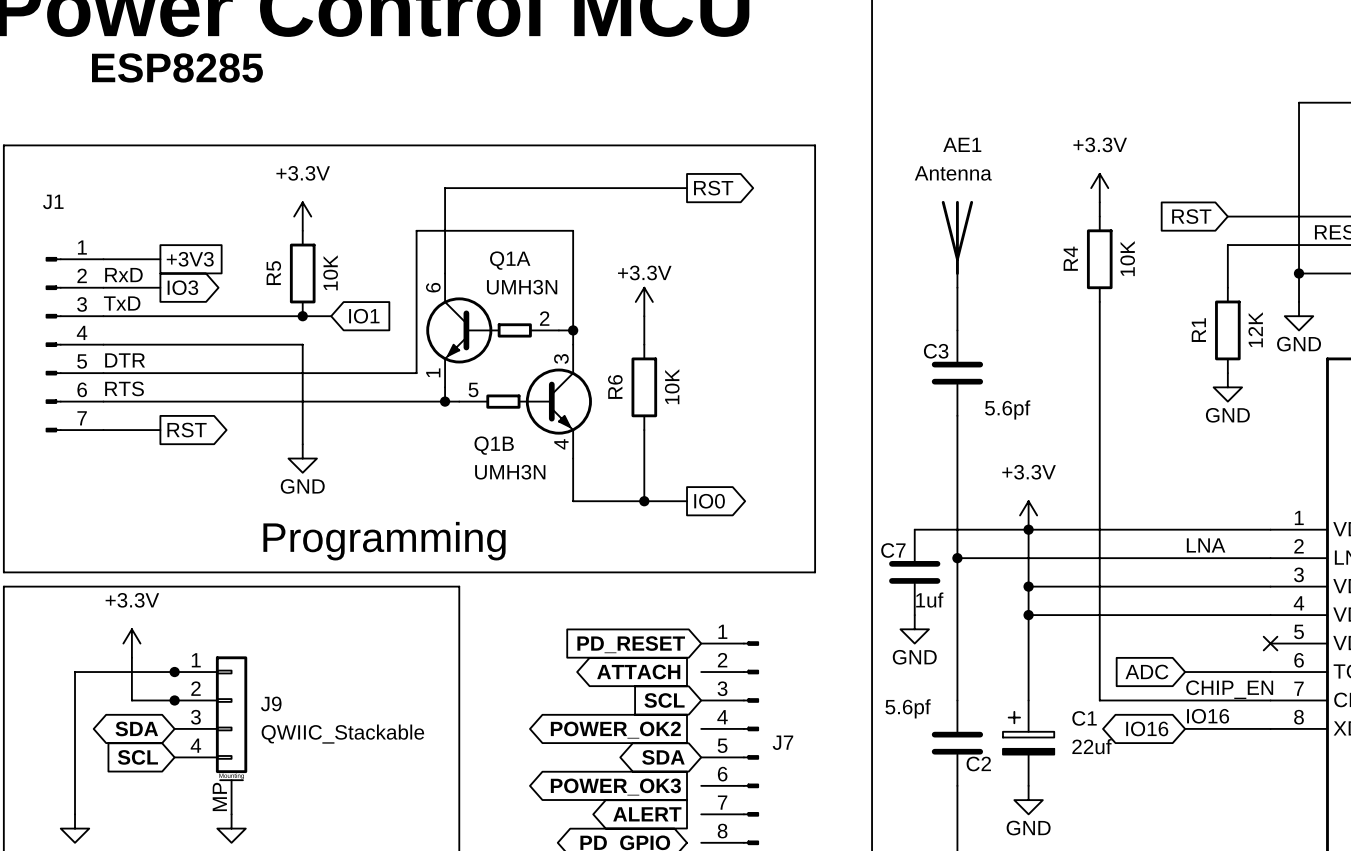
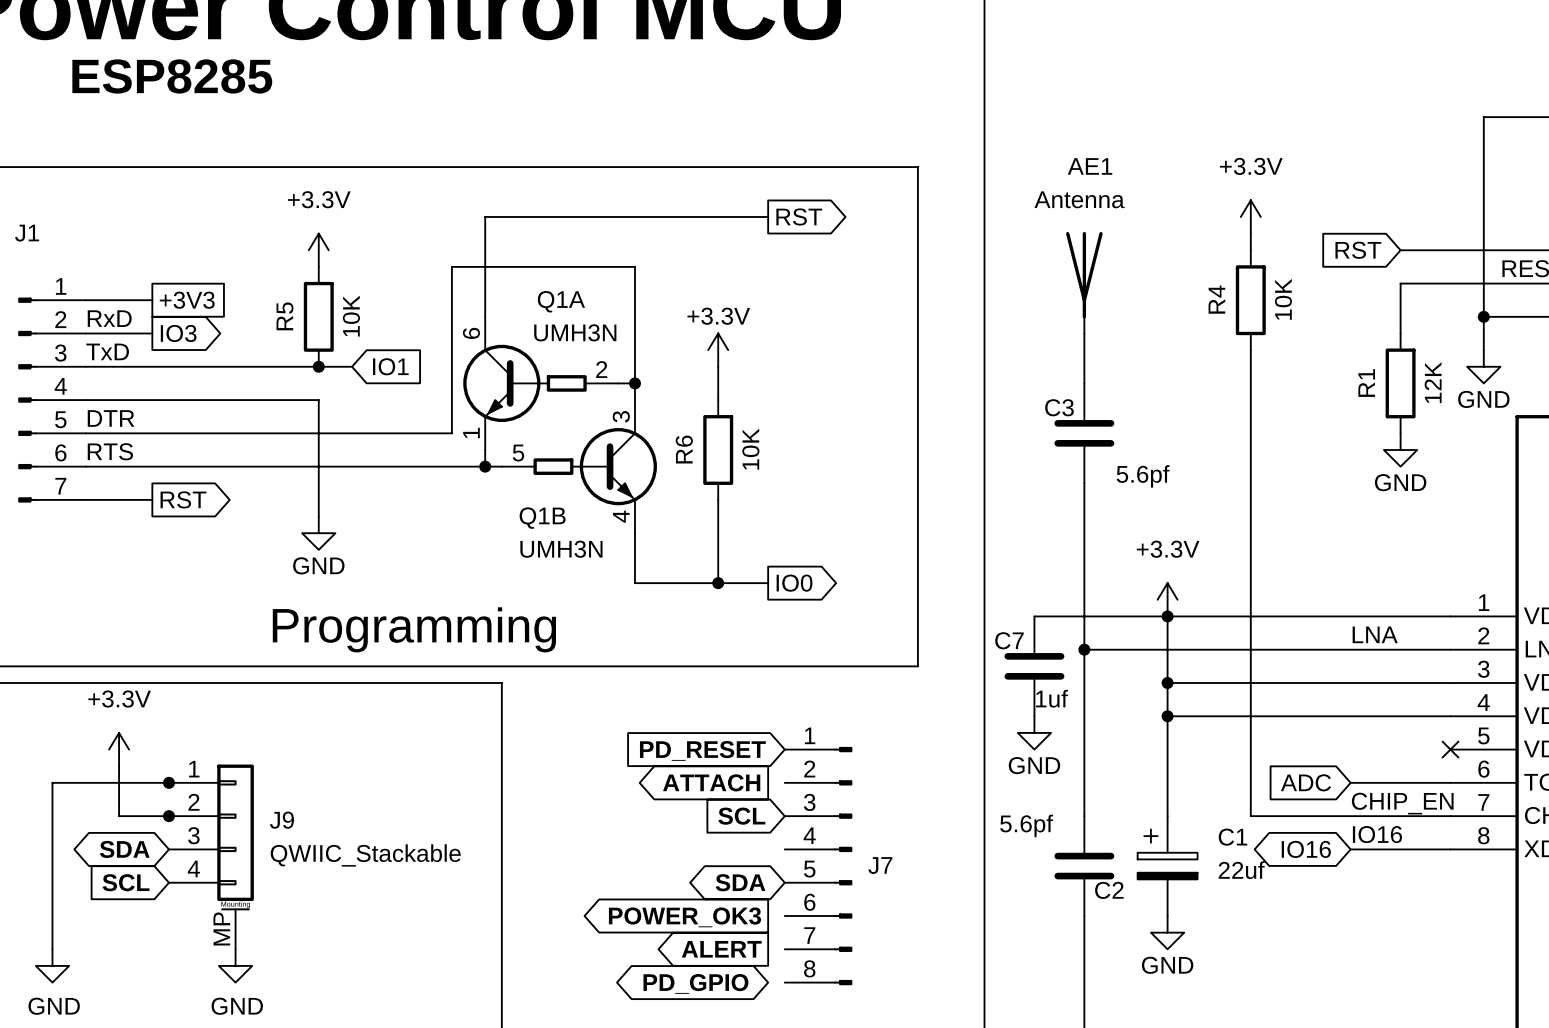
global label: POWER_OK2 (615, 730) -> none

